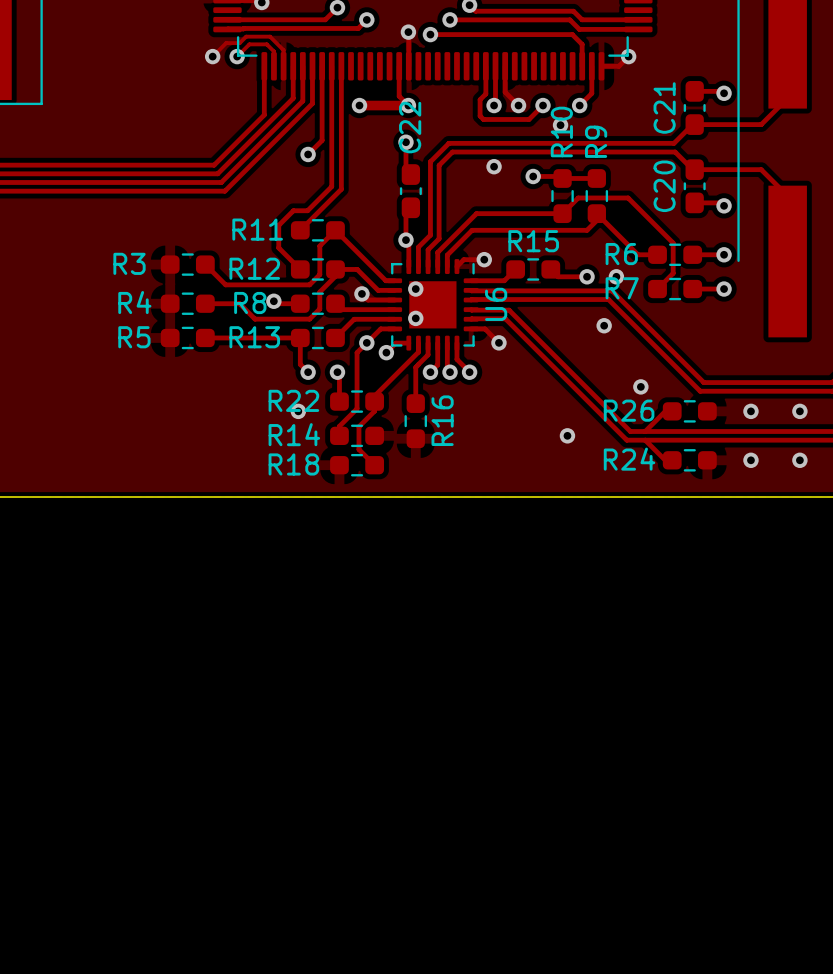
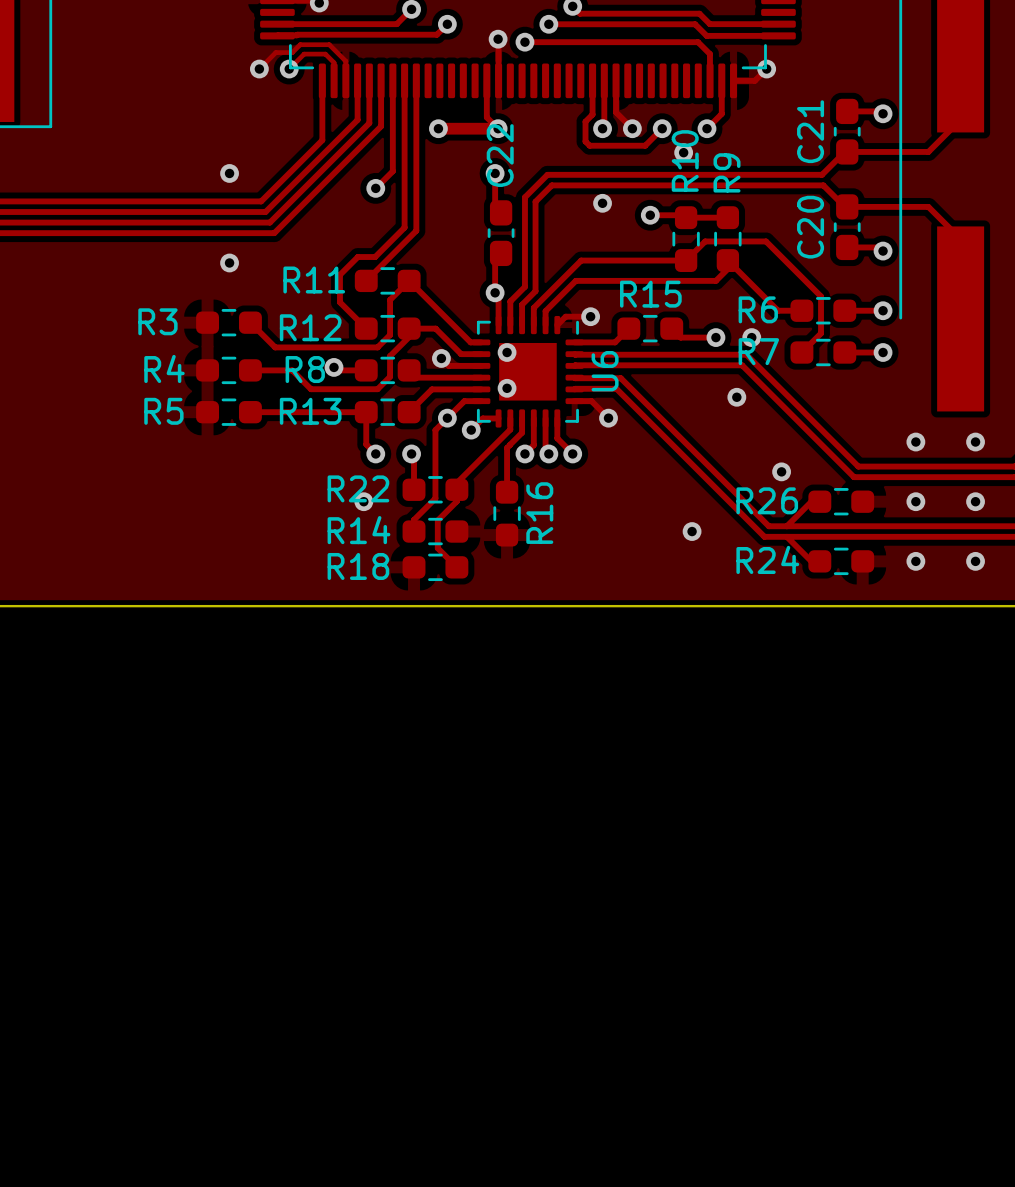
via: none -> (229, 173)
via: none -> (229, 262)
via: none -> (915, 442)
via: none -> (975, 442)

